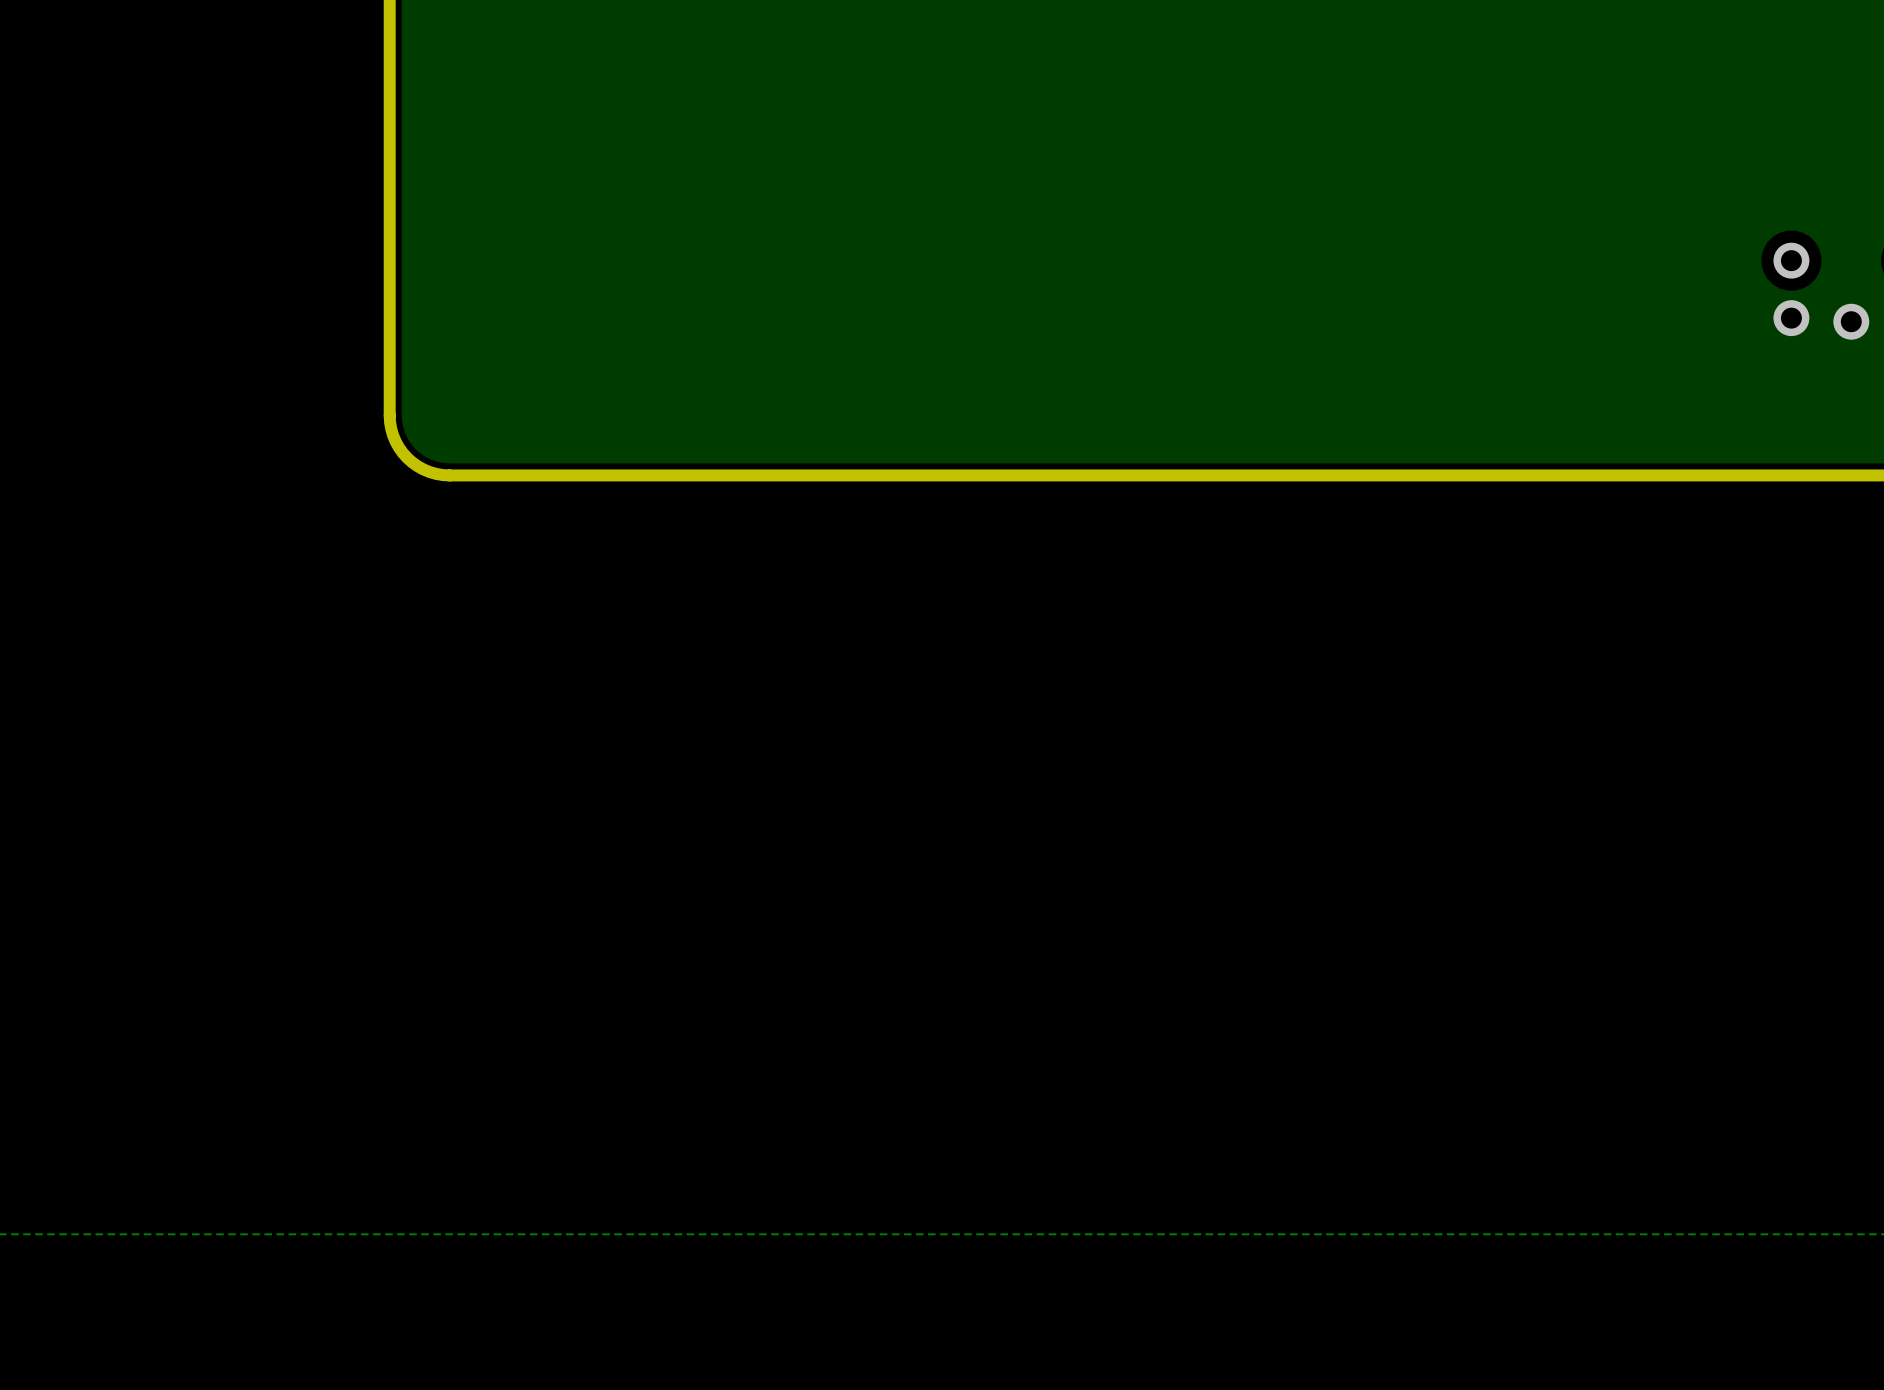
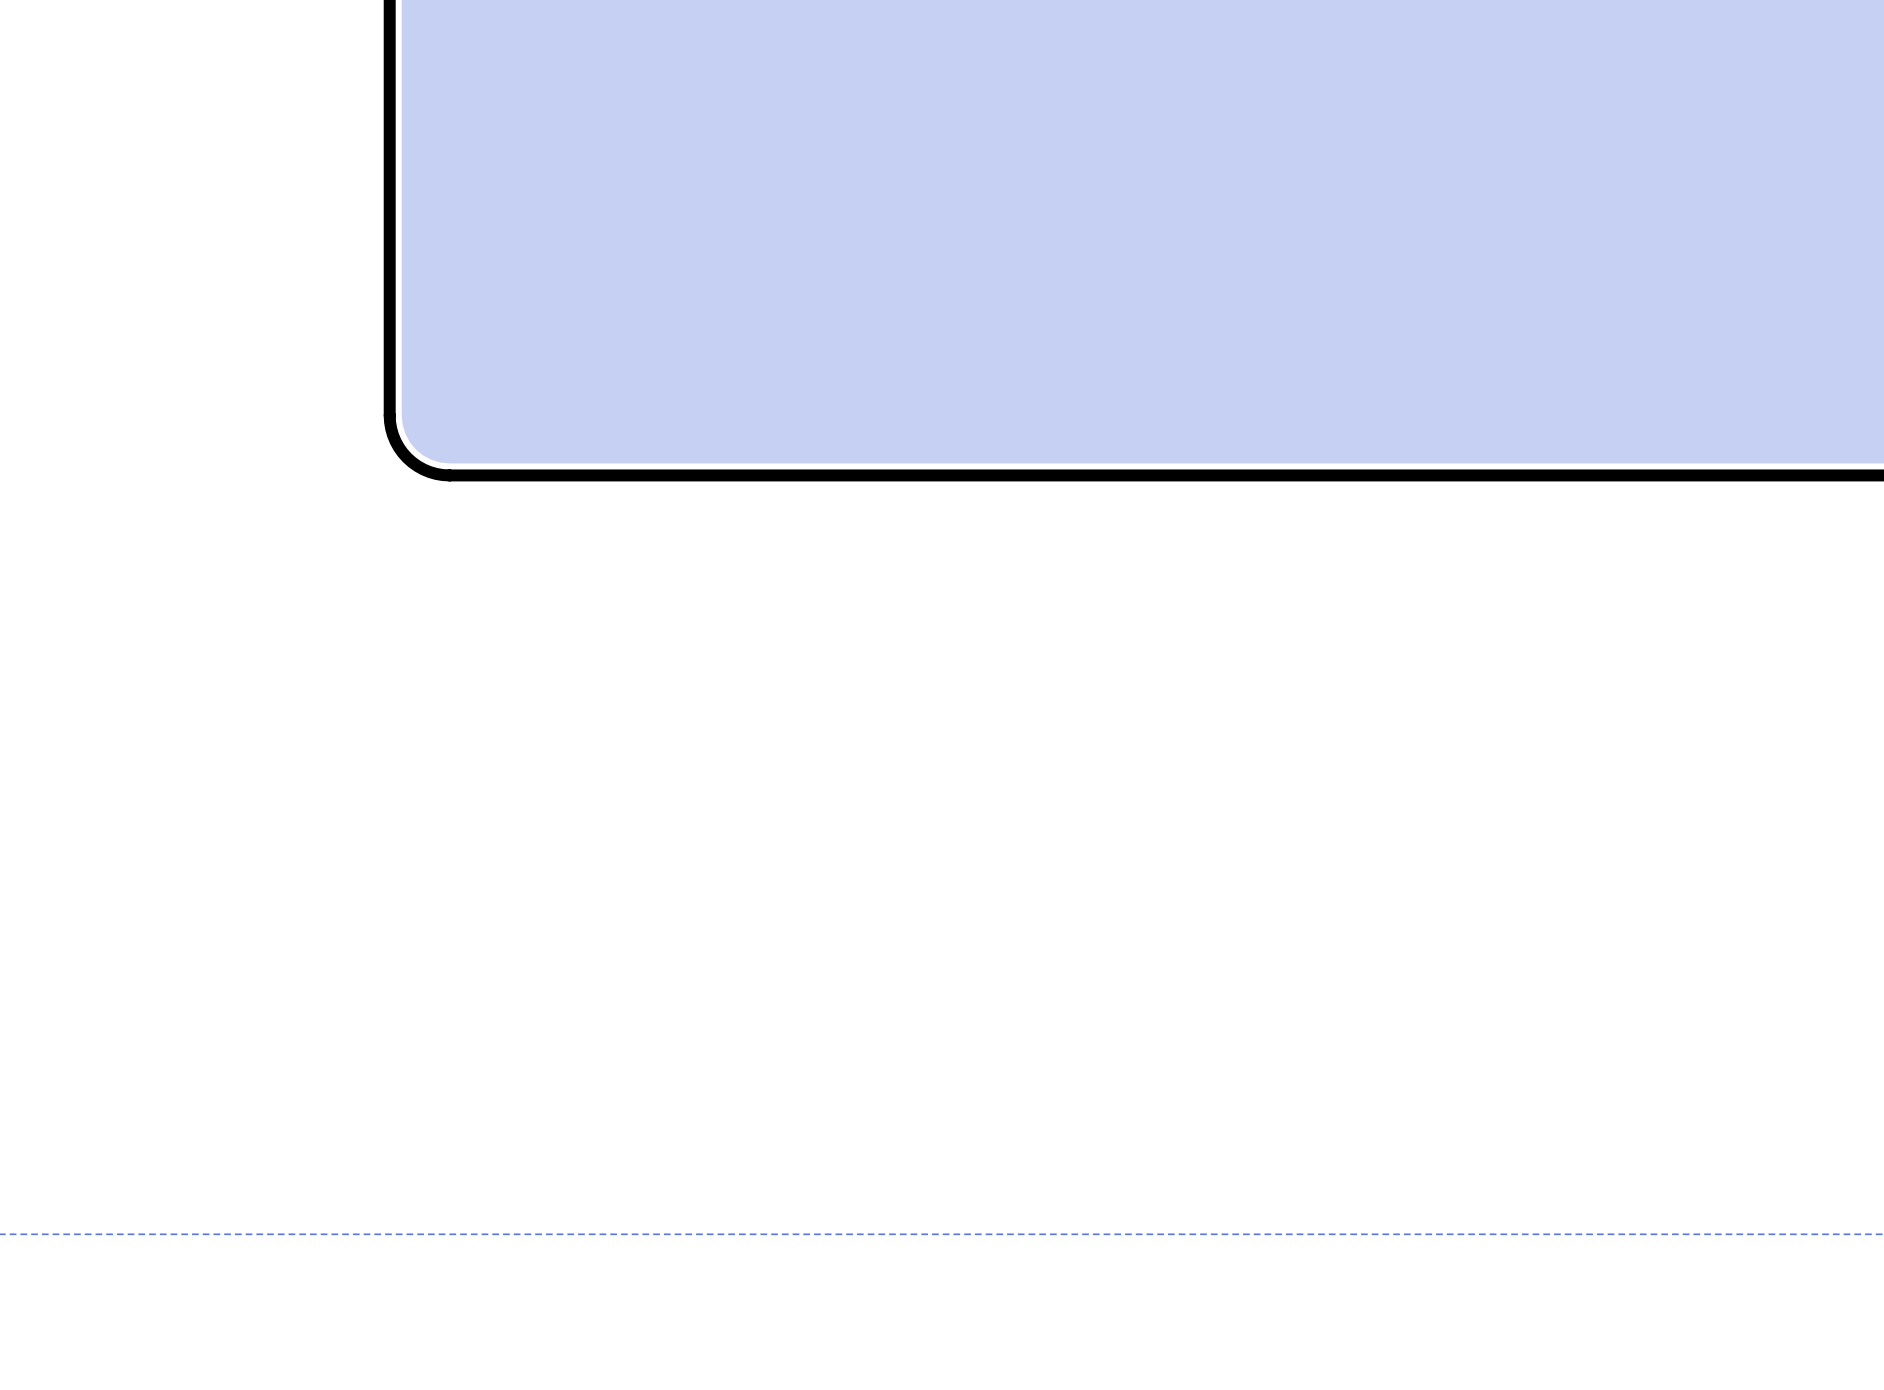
via: (1791, 260) -> none
via: (1791, 318) -> none
via: (1851, 321) -> none

